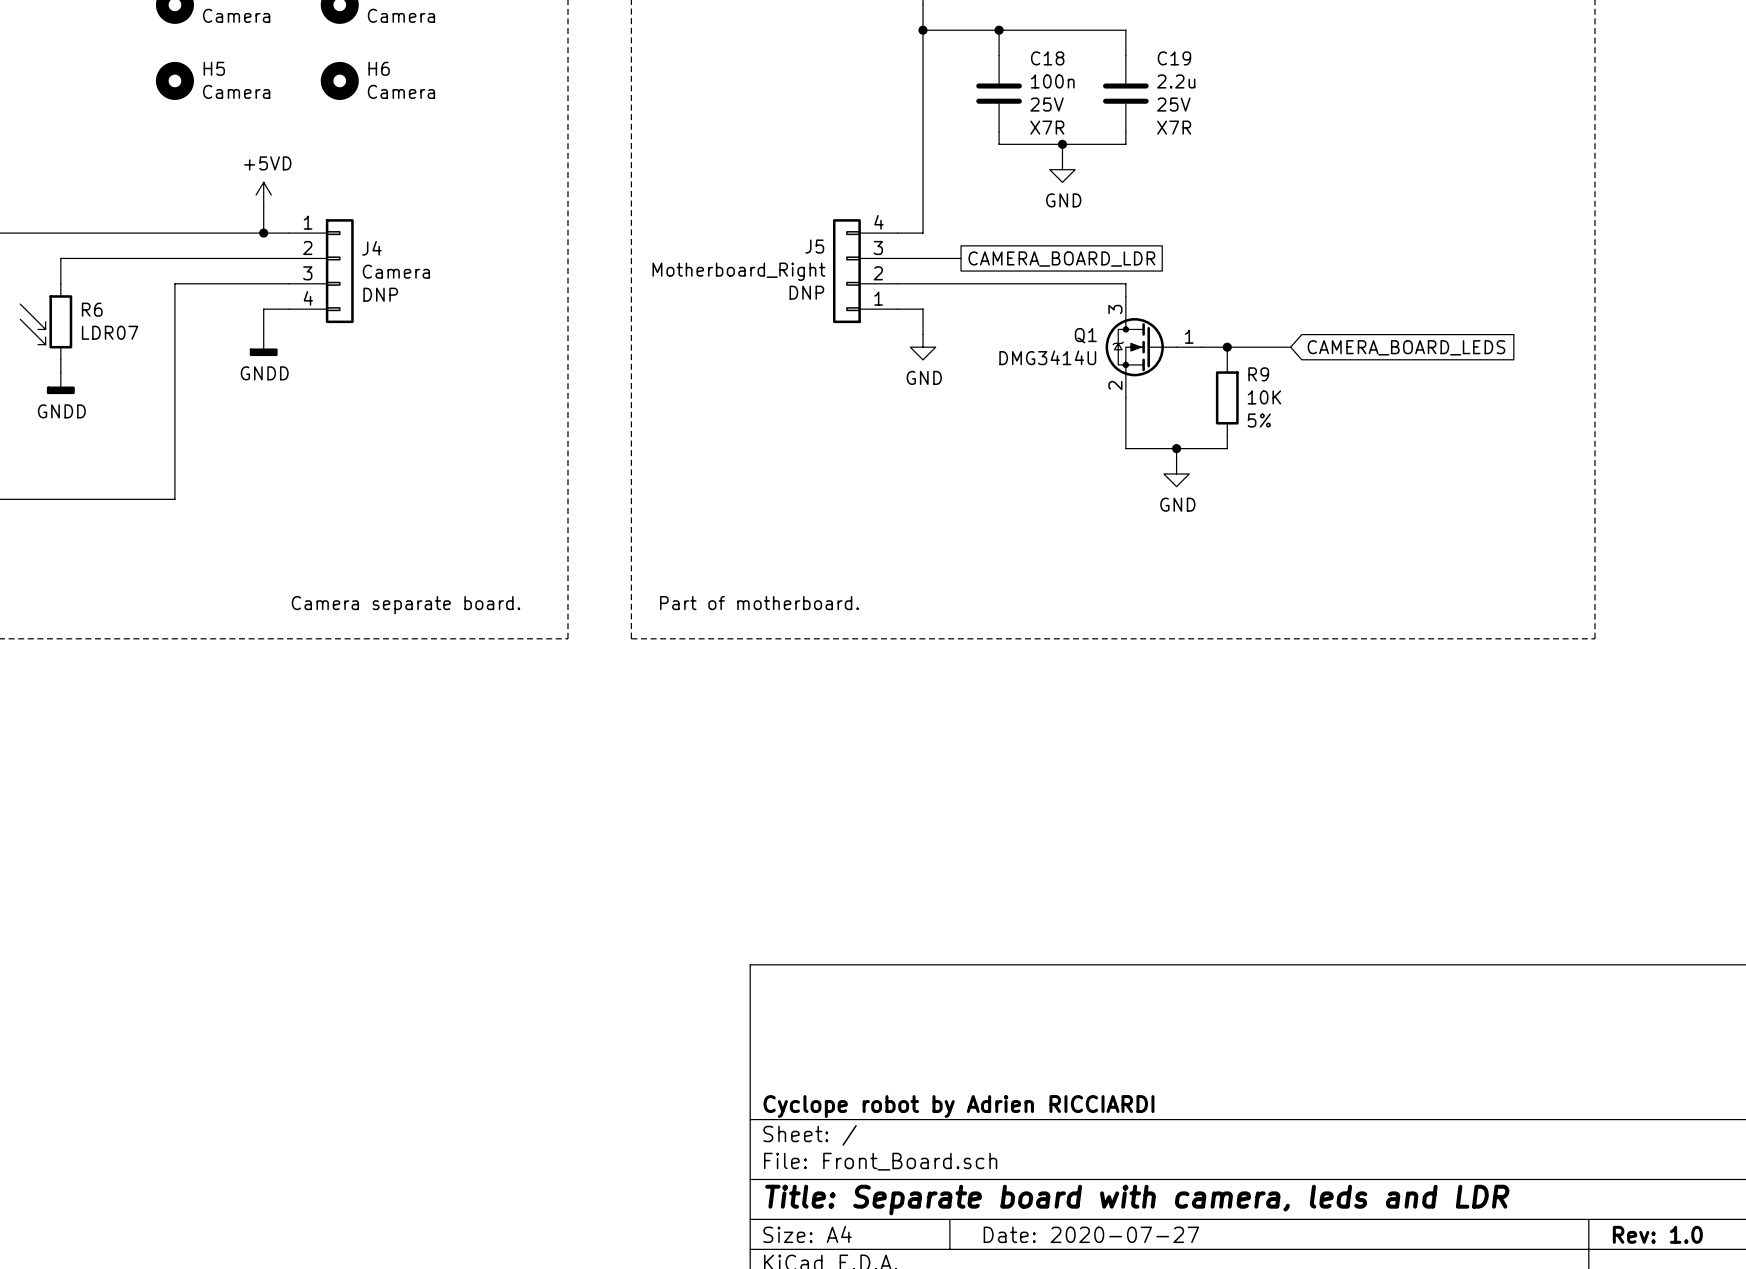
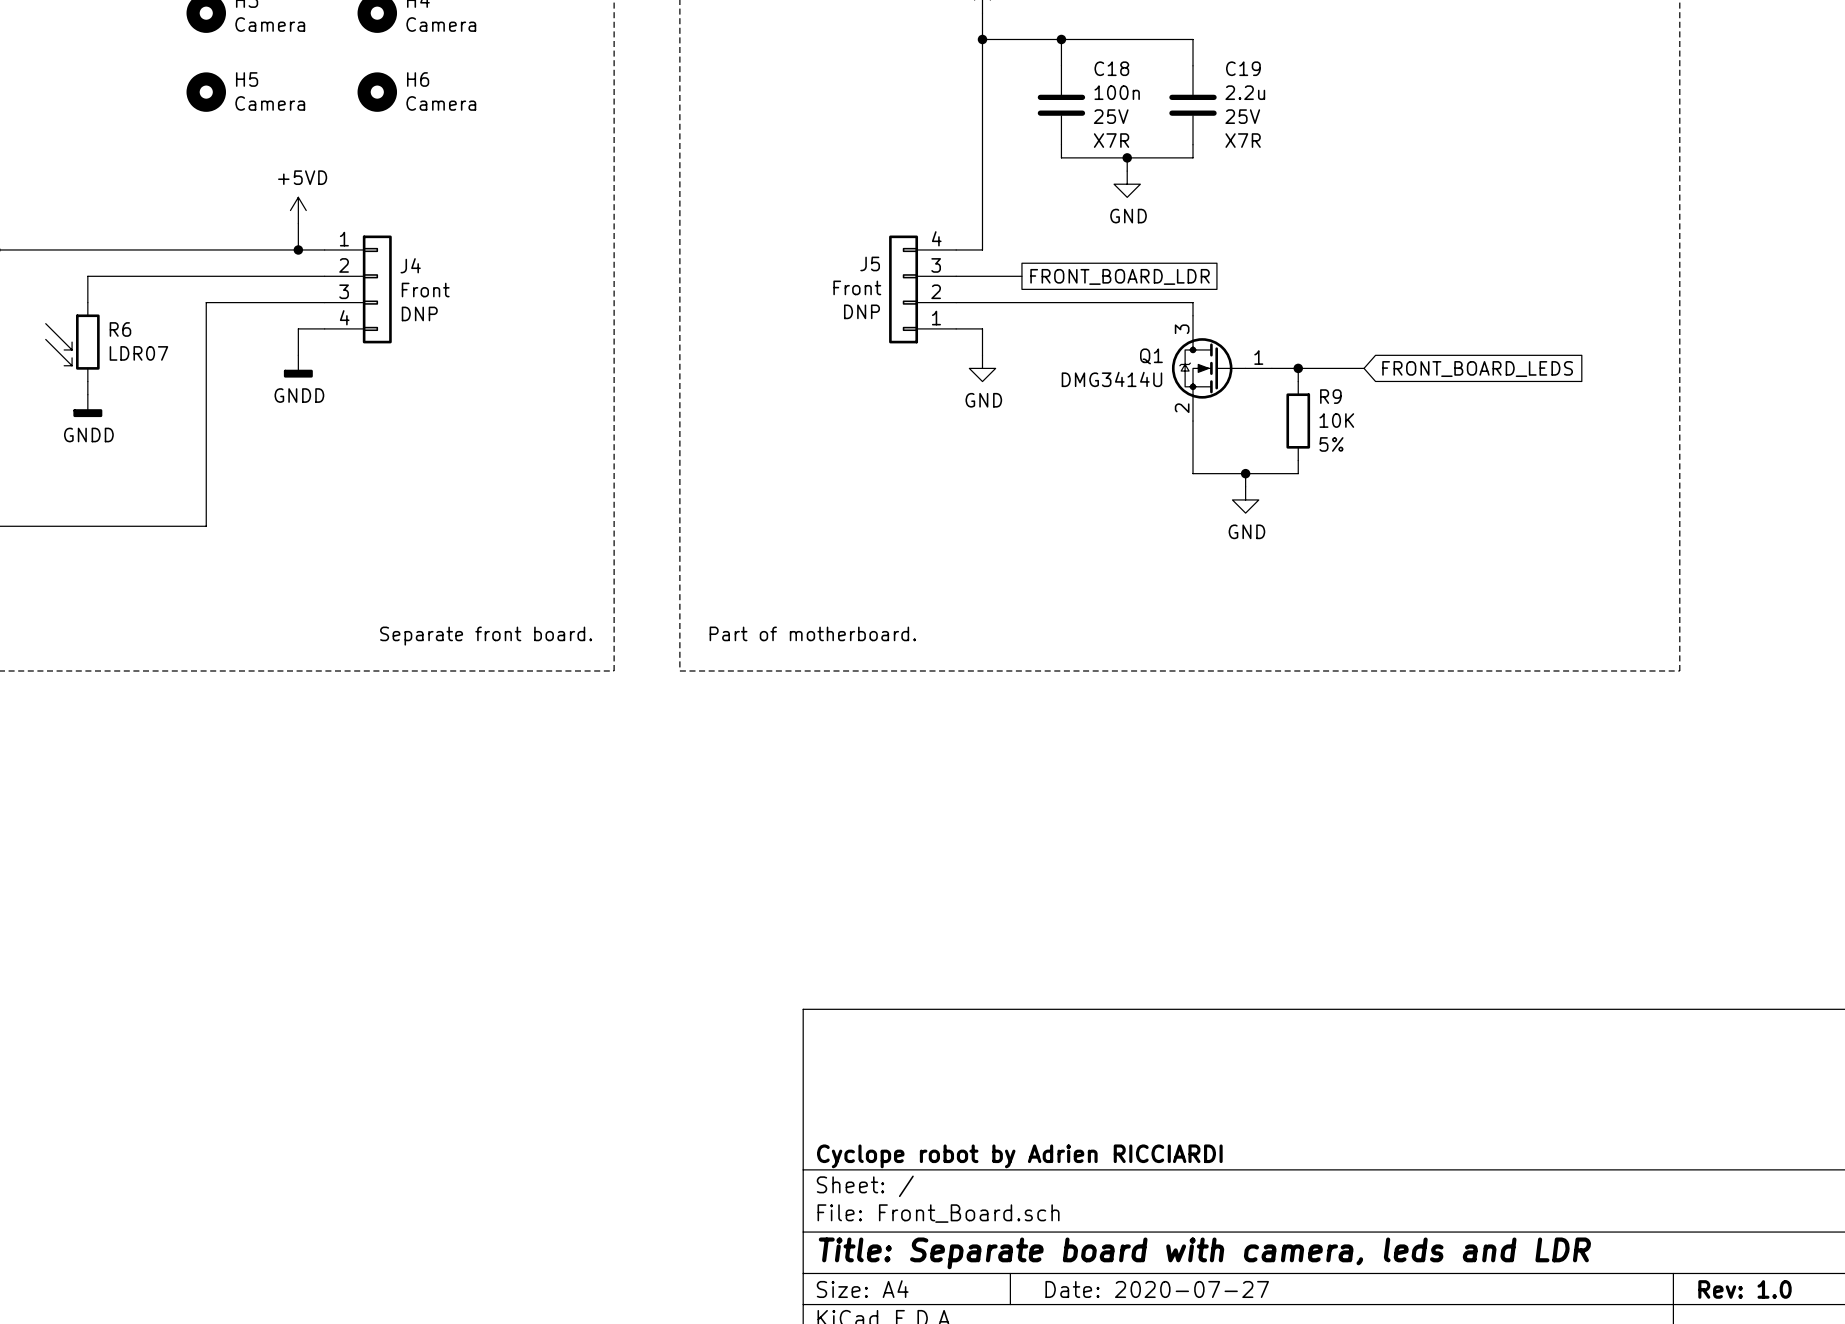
global label: CAMERA_BOARD_LDR (1061, 259) -> FRONT_BOARD_LDR (1120, 276)
J4 value: Camera (396, 271) -> Front (425, 290)
J5 value: Motherboard_Right (738, 271) -> Front (857, 287)
global label: CAMERA_BOARD_LEDS (1406, 347) -> FRONT_BOARD_LEDS (1477, 369)
text: Camera separate board. (405, 605) -> Separate front board. (486, 636)

